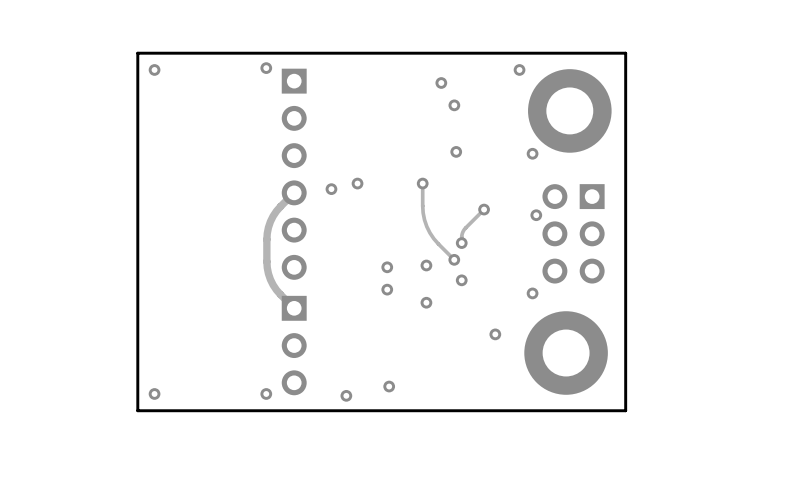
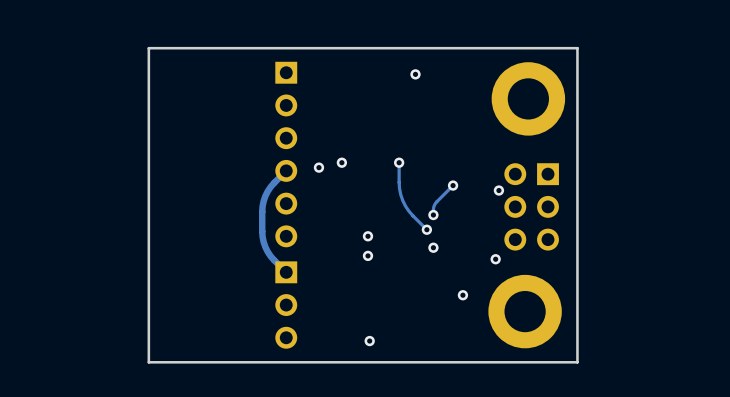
via: (266, 68) -> none
via: (154, 69) -> none
via: (519, 69) -> none
via: (454, 105) -> none
via: (456, 151) -> none
via: (532, 153) -> none
via: (426, 265) -> none
via: (426, 302) -> none
via: (154, 393) -> none
via: (266, 393) -> none
via: (346, 395) -> none

